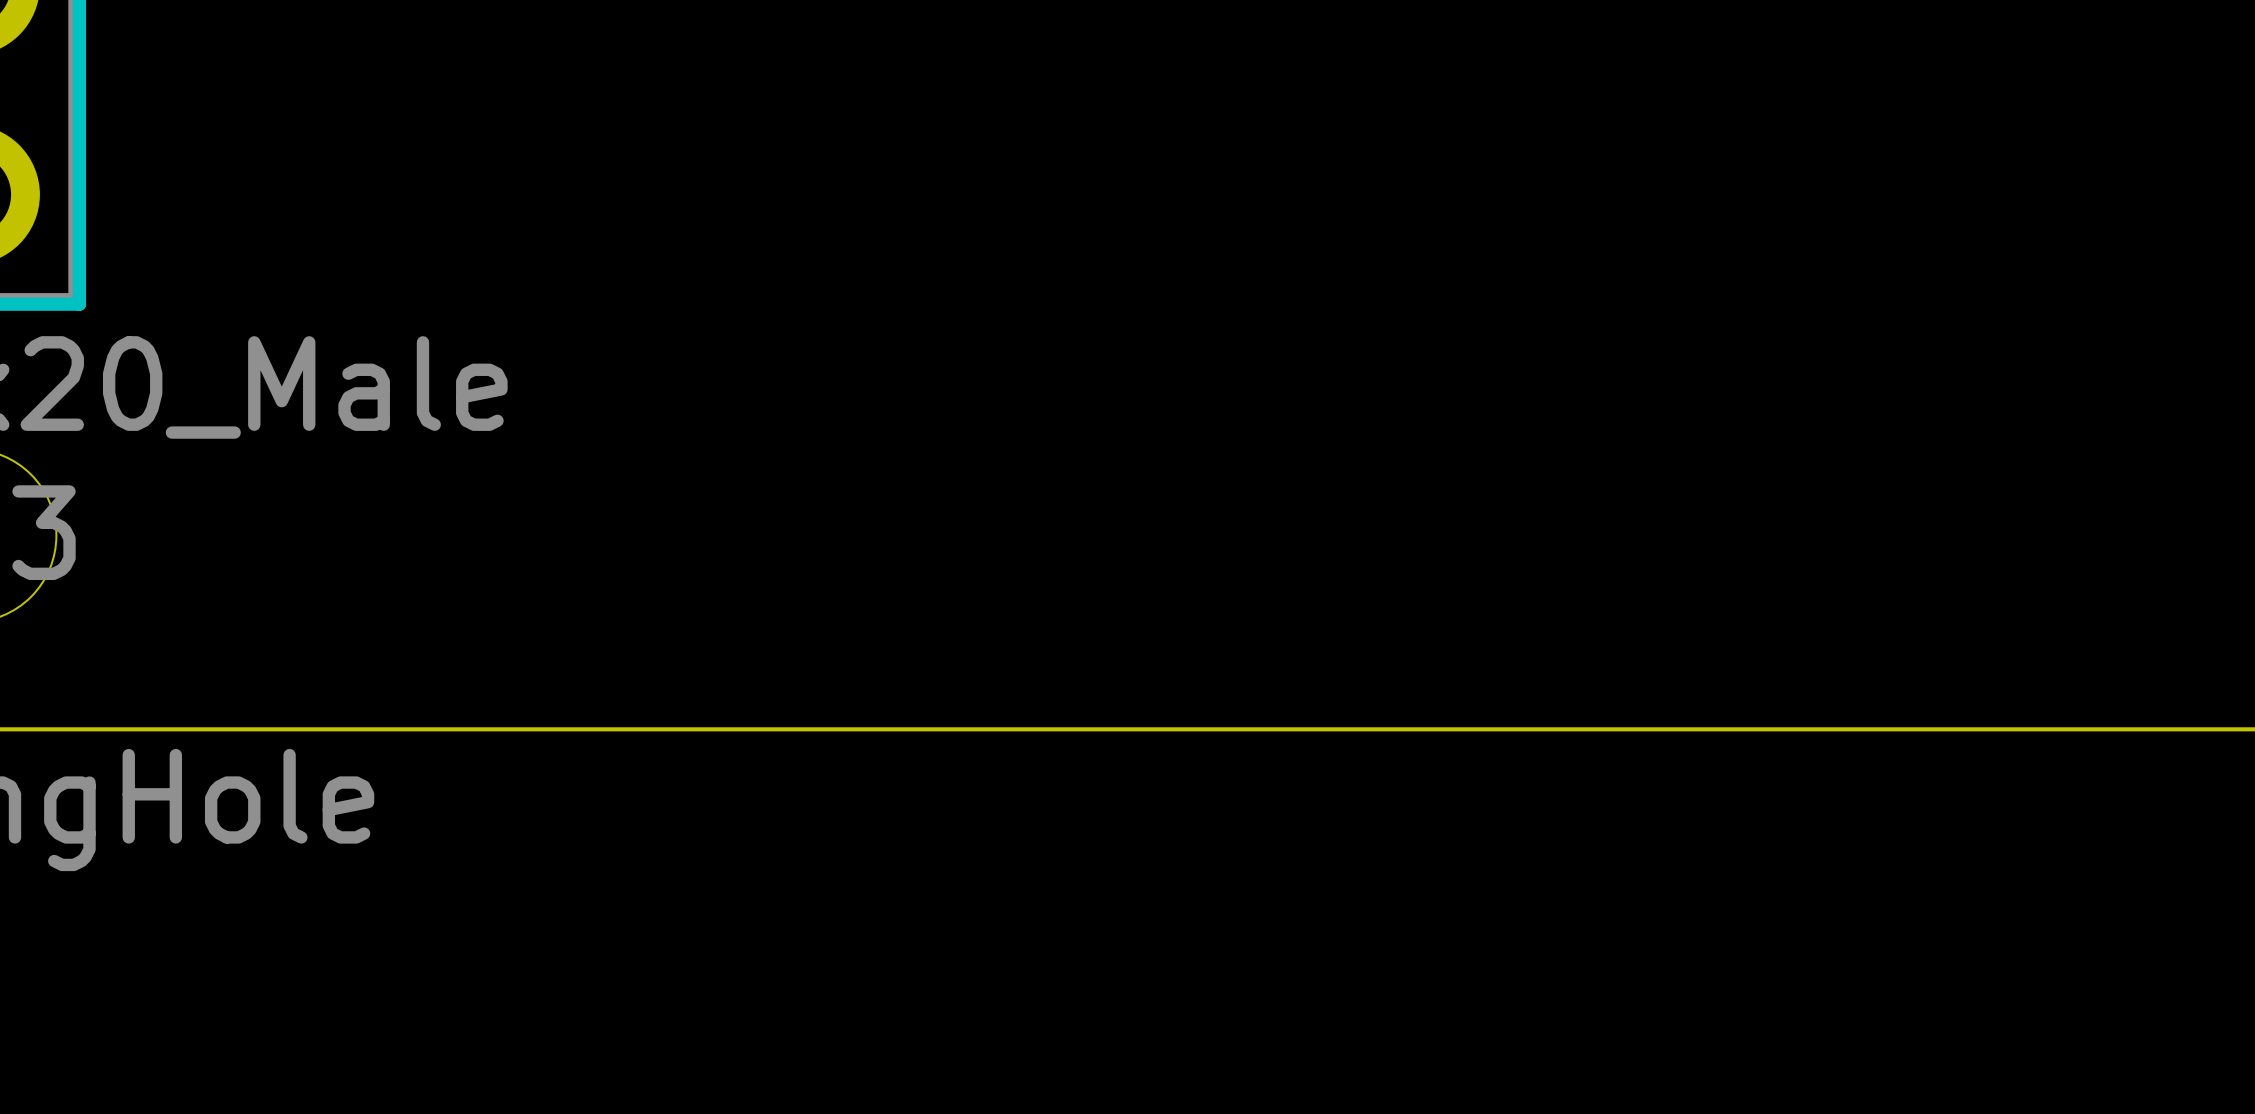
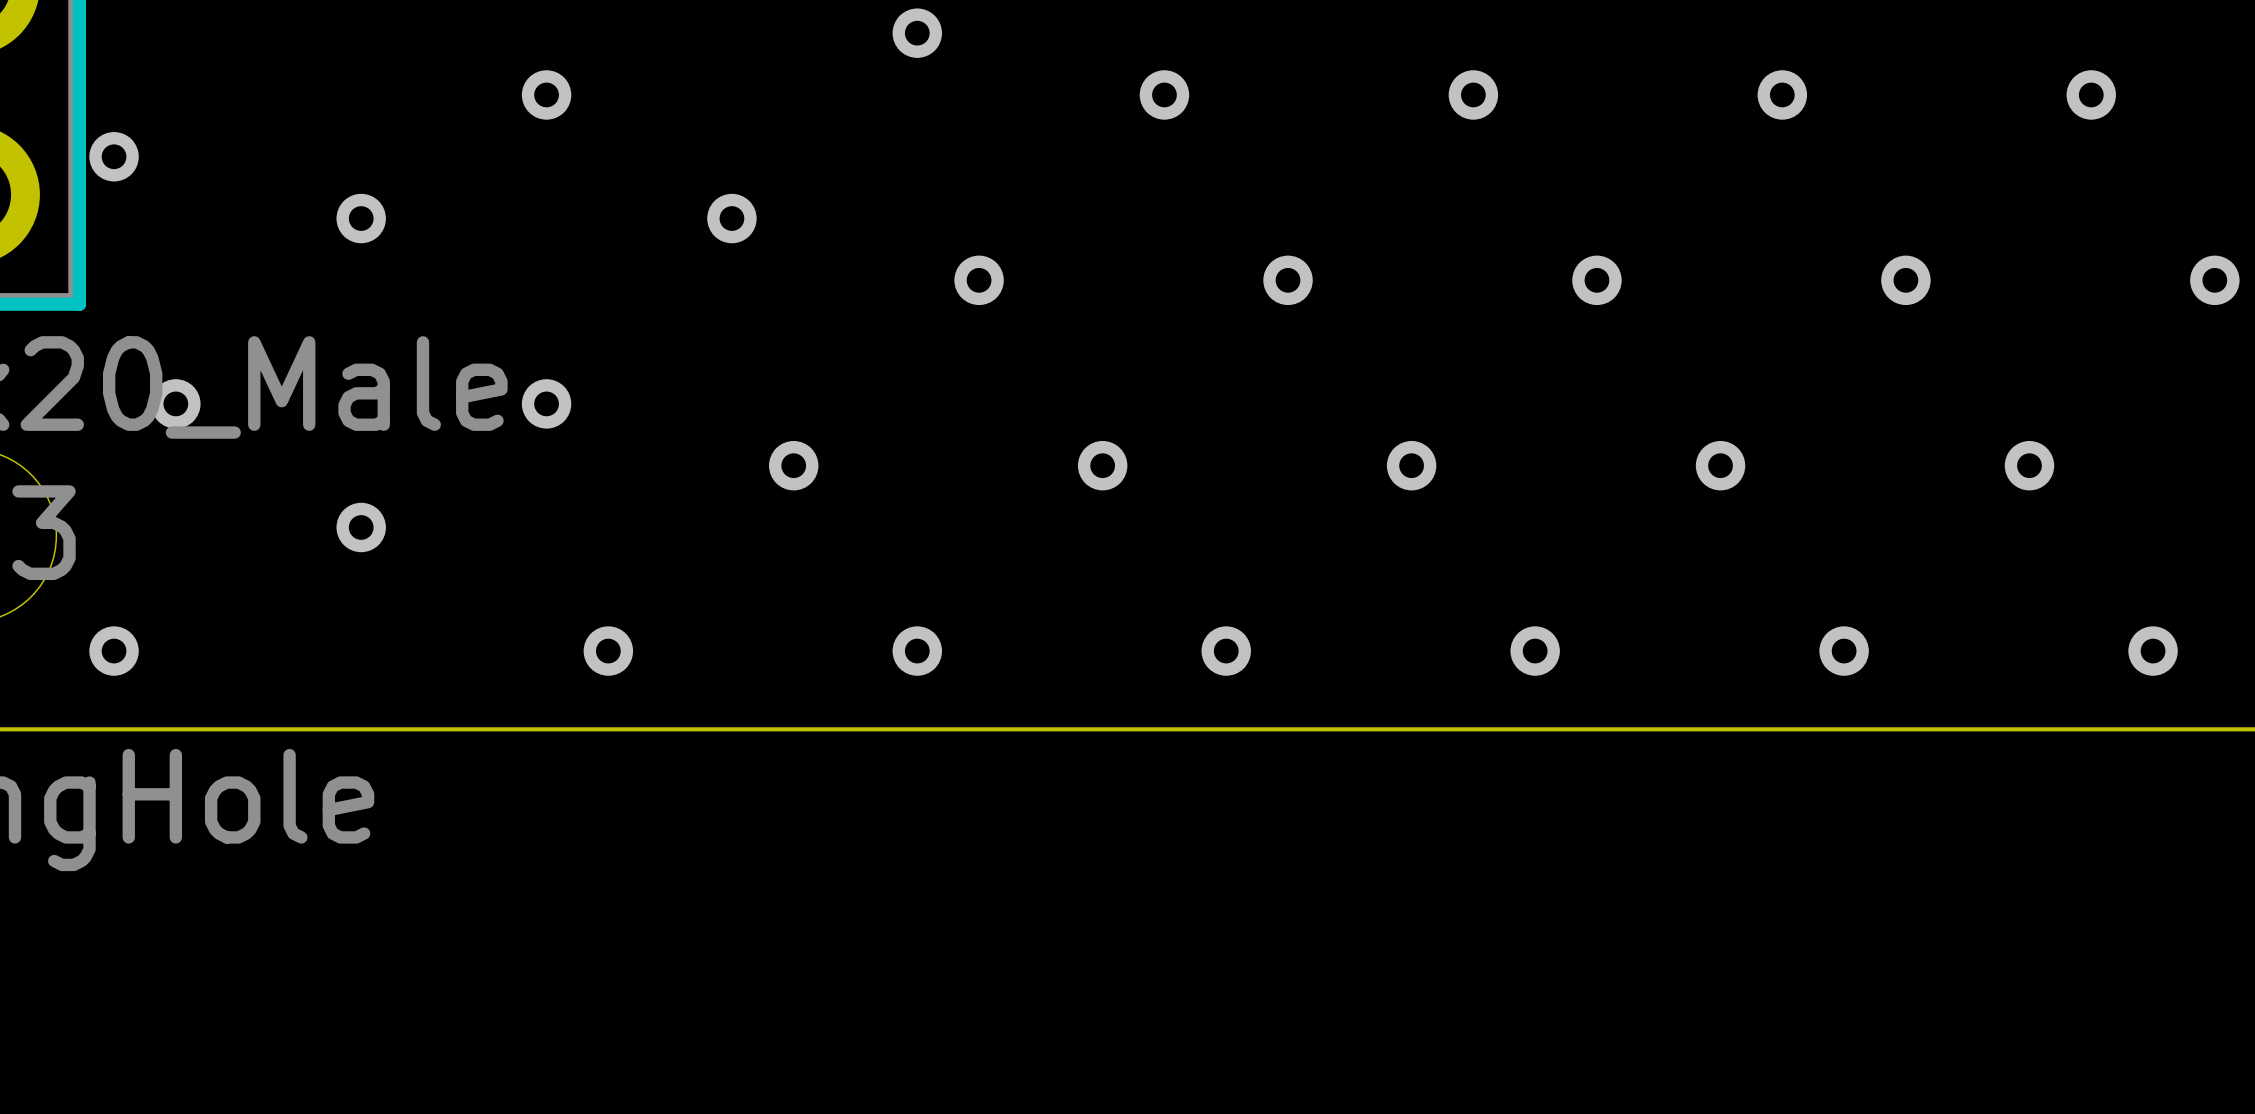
via: none -> (917, 33)
via: none -> (546, 94)
via: none -> (1164, 94)
via: none -> (1473, 94)
via: none -> (1782, 94)
via: none -> (2091, 94)
via: none -> (114, 156)
via: none -> (361, 218)
via: none -> (731, 218)
via: none -> (979, 280)
via: none -> (1288, 280)
via: none -> (1596, 280)
via: none -> (1905, 280)
via: none -> (2214, 280)
via: none -> (175, 403)
via: none -> (546, 403)
via: none -> (793, 465)
via: none -> (1102, 465)
via: none -> (1411, 465)
via: none -> (1720, 465)
via: none -> (2029, 465)
via: none -> (361, 527)
via: none -> (114, 651)
via: none -> (608, 651)
via: none -> (917, 651)
via: none -> (1226, 651)
via: none -> (1535, 651)
via: none -> (1844, 651)
via: none -> (2153, 651)

